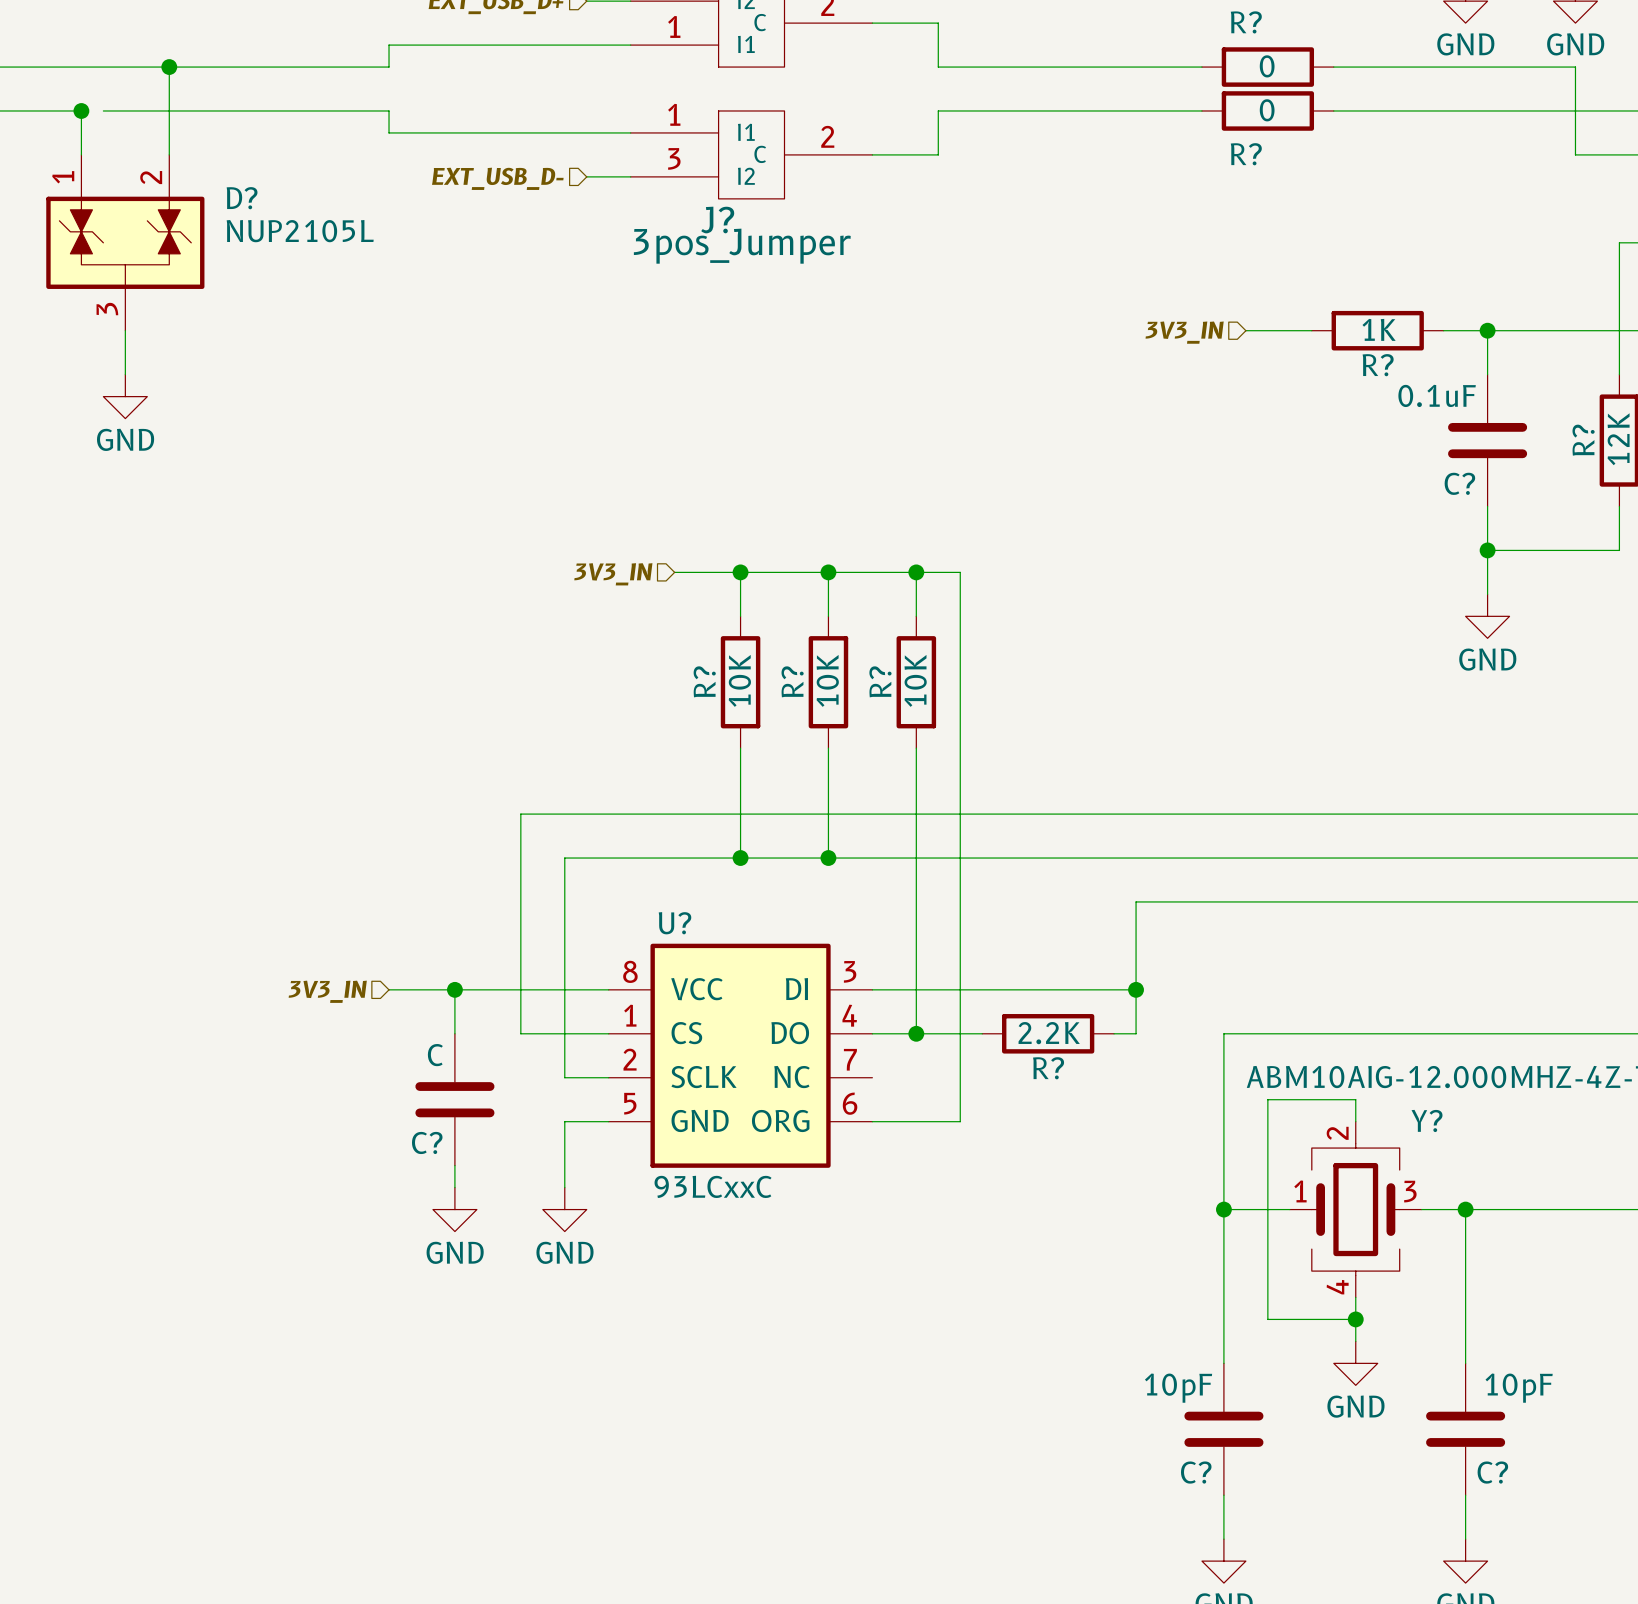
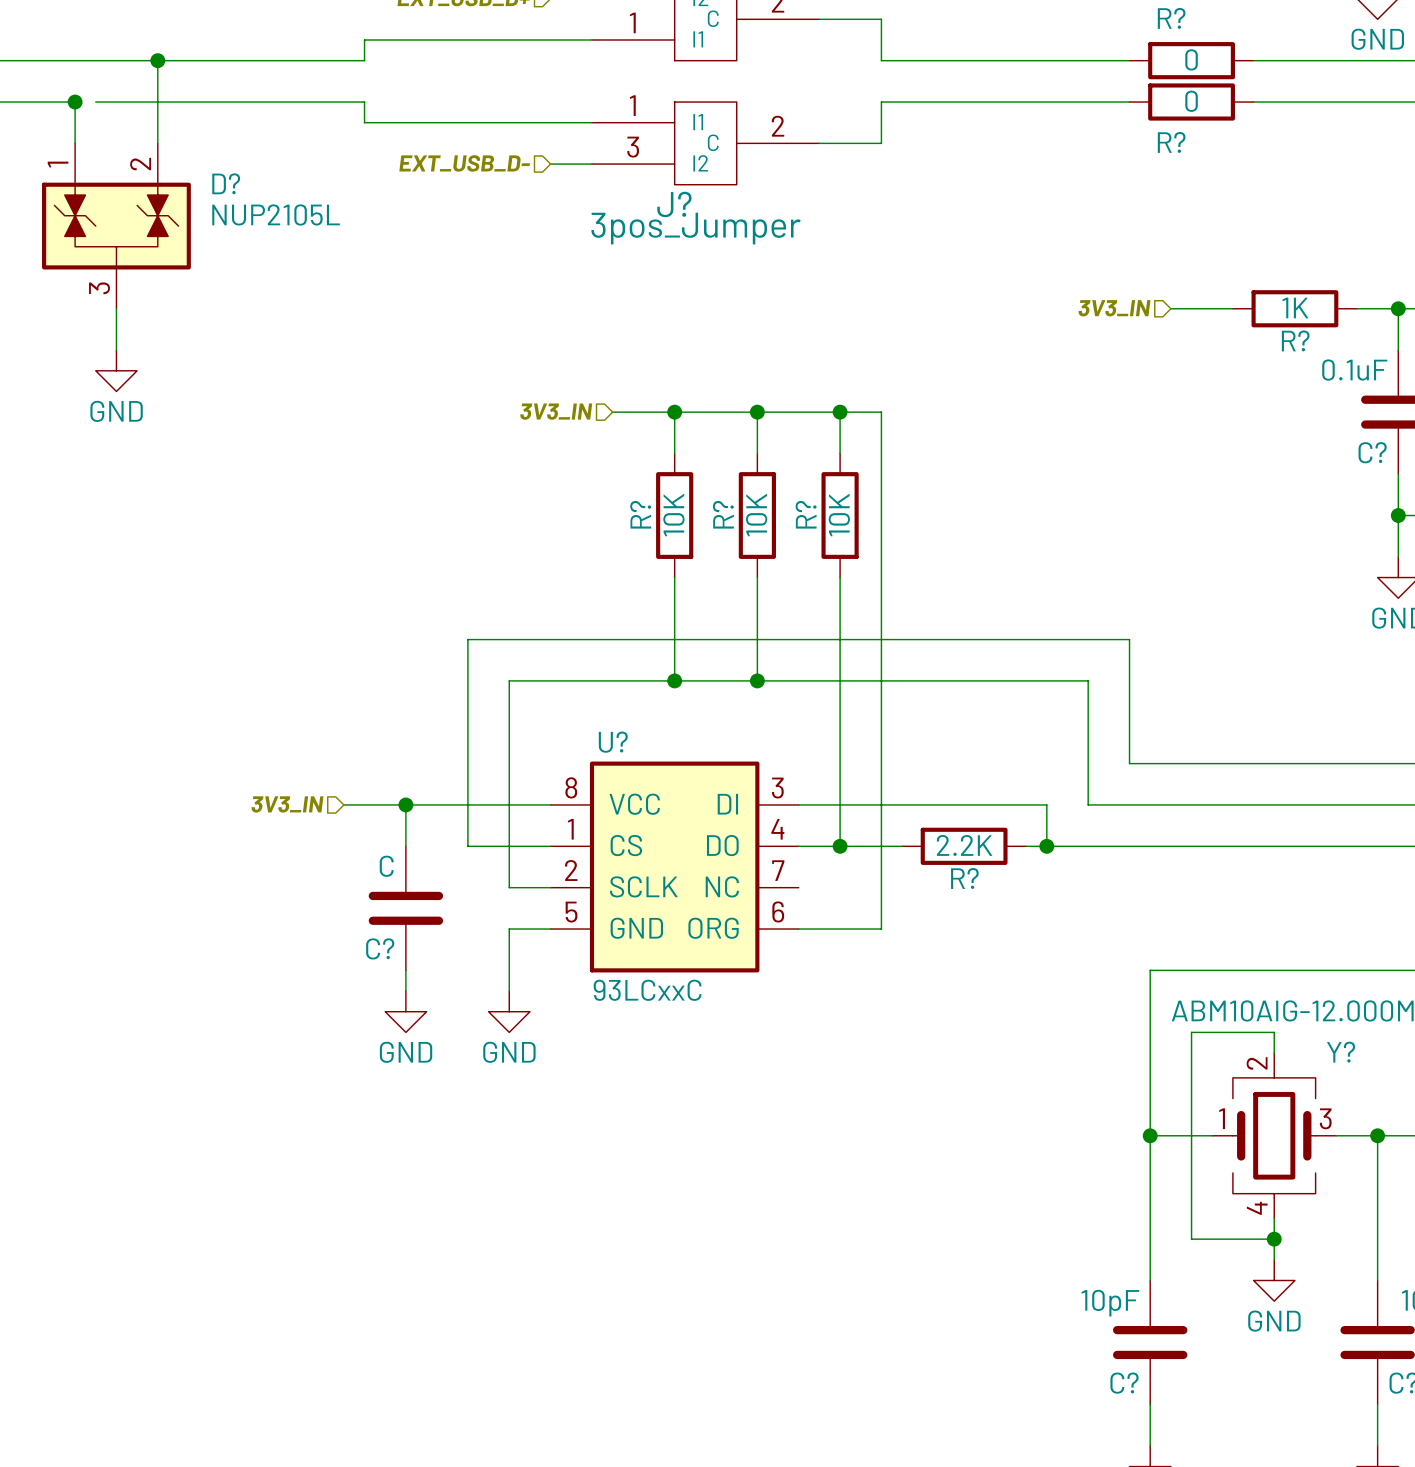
junction: none -> (674, 412)
junction: none -> (757, 412)
junction: none -> (840, 412)
R?: none -> 10K (674, 515)
R?: none -> 10K (757, 515)
R?: none -> 10K (840, 515)
wire: (674, 572) (960, 572) (960, 1121) (872, 1121) -> none
wire: (740, 572) (740, 616) -> (674, 412) (674, 453)
junction: (740, 572) -> none
wire: (828, 572) (828, 616) -> (757, 412) (757, 453)
junction: (828, 572) -> none
wire: (916, 572) (916, 616) -> (840, 412) (840, 453)
junction: (916, 572) -> none
hierarchical label position: 3V3_IN (613, 574) -> 3V3_IN (556, 411)
R?: 10K (740, 682) -> none
R?: 10K (828, 682) -> none
R?: 10K (916, 682) -> none
junction: none -> (674, 680)
junction: none -> (757, 680)
wire: (740, 748) (740, 858) -> (674, 577) (674, 680)
wire: (828, 748) (828, 858) -> (757, 577) (757, 680)
wire: (916, 748) (916, 1033) -> (840, 577) (840, 846)
wire: (1201, 814) (520, 814) (520, 1033) (608, 1033) -> (1129, 763) (1129, 639) (467, 639) (467, 846) (550, 846)
junction: none -> (405, 804)
wire: (564, 858) (564, 1077) (608, 1077) -> (529, 804) (343, 804)
junction: (740, 858) -> none
junction: (828, 858) -> none
wire: (1114, 858) (1158, 858) -> (1046, 804) (1046, 846)
wire: none -> (1088, 804) (1088, 680) (509, 680) (509, 887) (550, 887)
junction: none -> (840, 846)
wire: (1136, 901) (1136, 1033) (1114, 1033) -> (1067, 846) (1026, 846)
wire: (389, 989) (542, 989) -> (509, 991) (509, 929)
wire: (454, 989) (454, 1033) -> (405, 804) (405, 846)
junction: (454, 989) -> none
wire: (938, 989) (1136, 989) -> (881, 929) (881, 412) (612, 412)
junction position: (1136, 989) -> (1046, 846)
hierarchical label position: 3V3_IN (327, 991) -> 3V3_IN (287, 804)
wire: (872, 1033) (982, 1033) -> (798, 846) (902, 846)
junction: (916, 1033) -> none
R? position: (1048, 1033) -> (964, 846)
U? position: (740, 1055) -> (674, 867)
power symbol: none -> GND (405, 1011)
power symbol: none -> GND (509, 1011)
C? position: (454, 1099) -> (405, 908)
wire: (608, 1121) (564, 1121) (564, 1187) -> none
wire: (454, 1165) (454, 1187) -> (405, 970) (405, 991)
power symbol: GND (454, 1209) -> none
power symbol: GND (564, 1209) -> none

